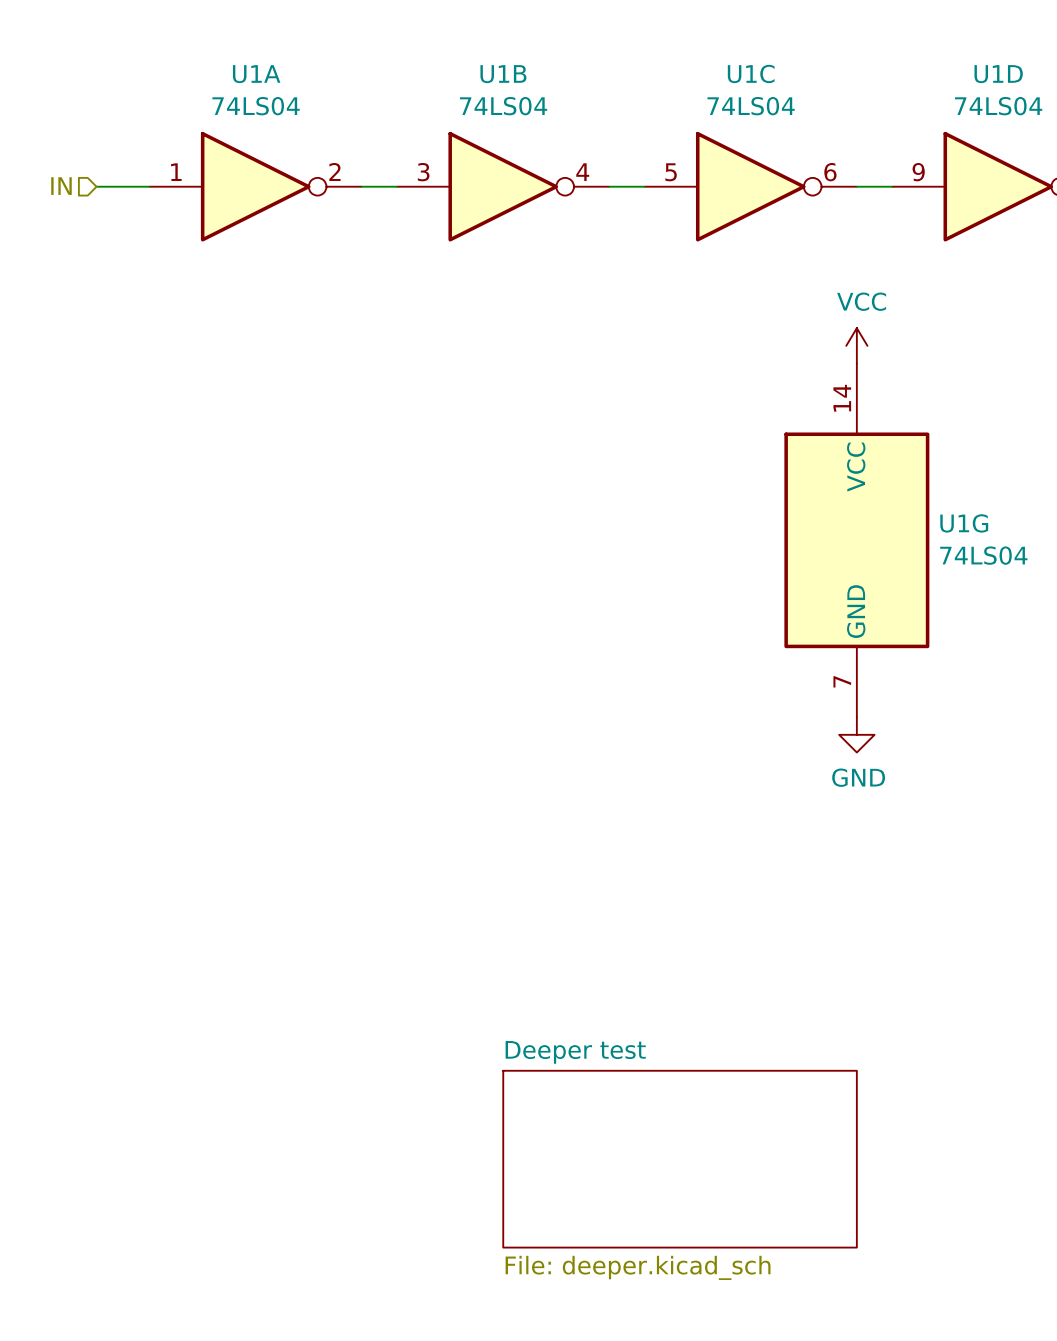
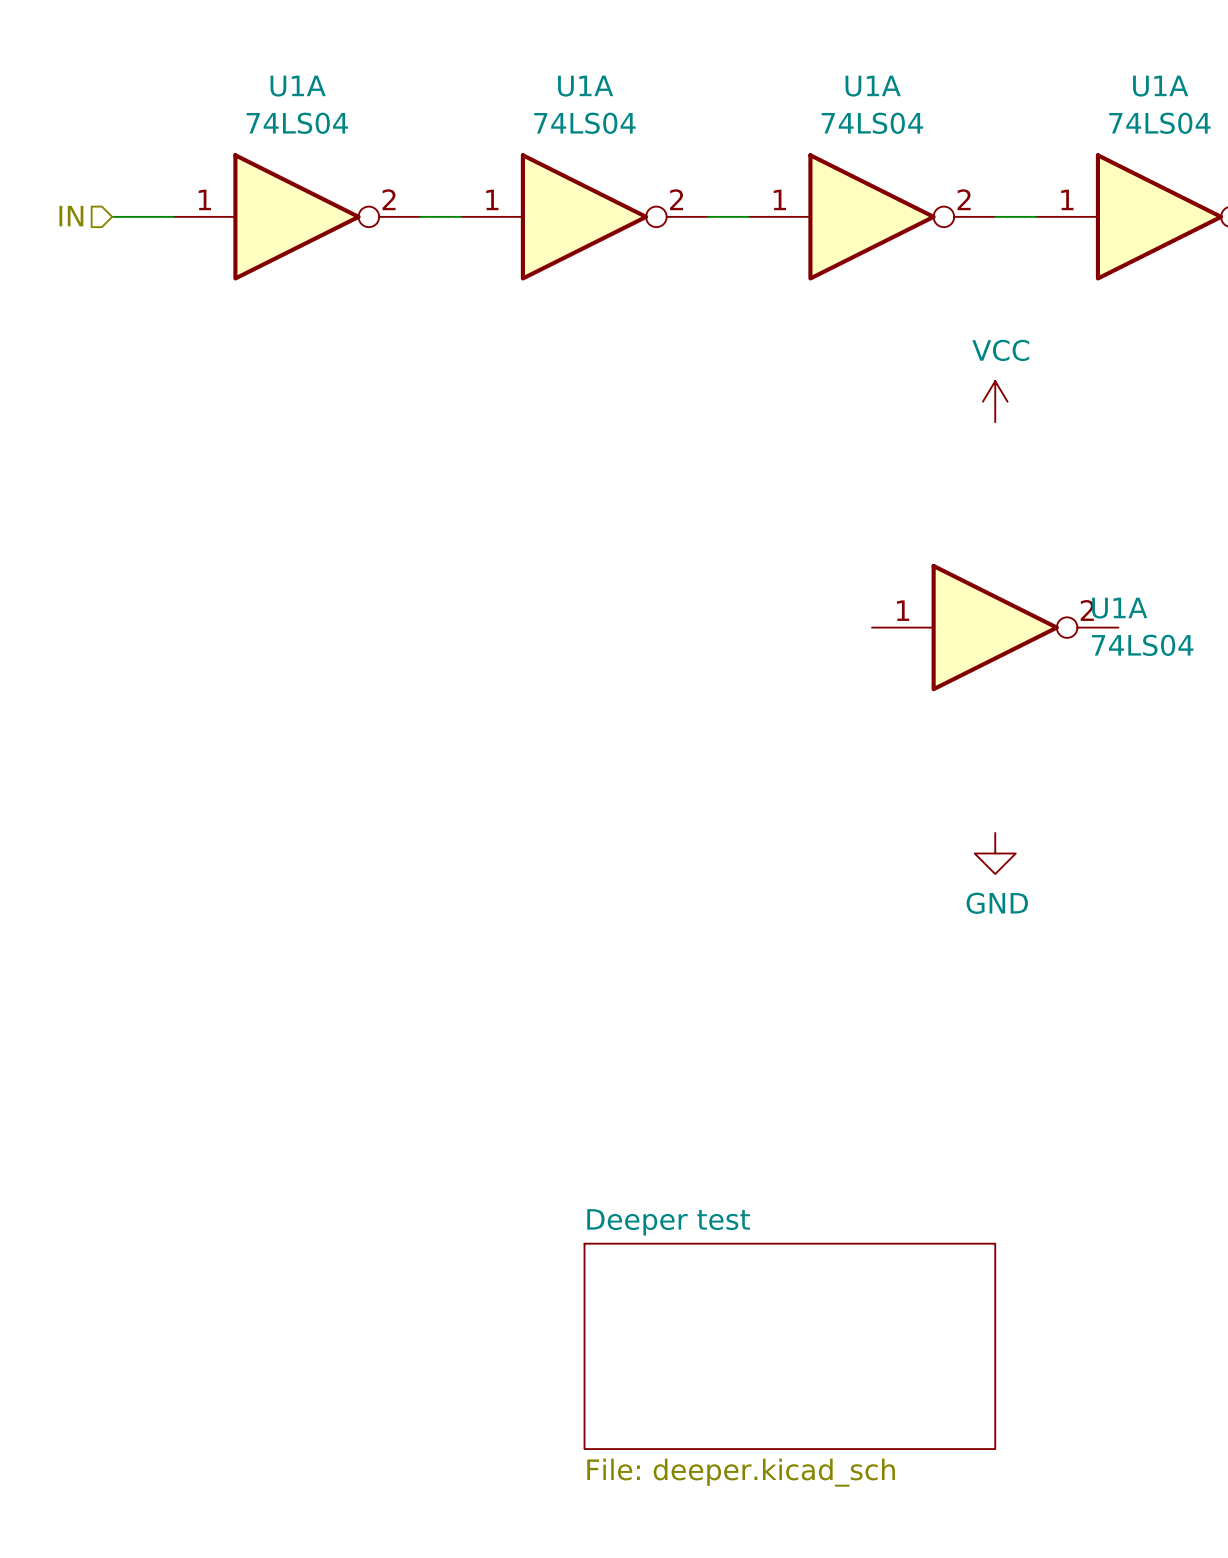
U1C name: U1C (751, 73) -> U1A (873, 86)
U1B name: U1B (503, 74) -> U1A (585, 86)
U1D name: U1D (998, 74) -> U1A (1160, 86)
U1B pin number: 3 (423, 172) -> 1 (492, 199)
U1B pin number: 4 (582, 172) -> 2 (676, 199)
U1C pin number: 5 (671, 172) -> 1 (779, 199)
U1C pin number: 6 (830, 172) -> 2 (964, 199)
U1D pin number: 9 (918, 172) -> 1 (1067, 199)
U1G: 74LS04 (856, 540) -> none
U1A: none -> 74LS04 (995, 627)

